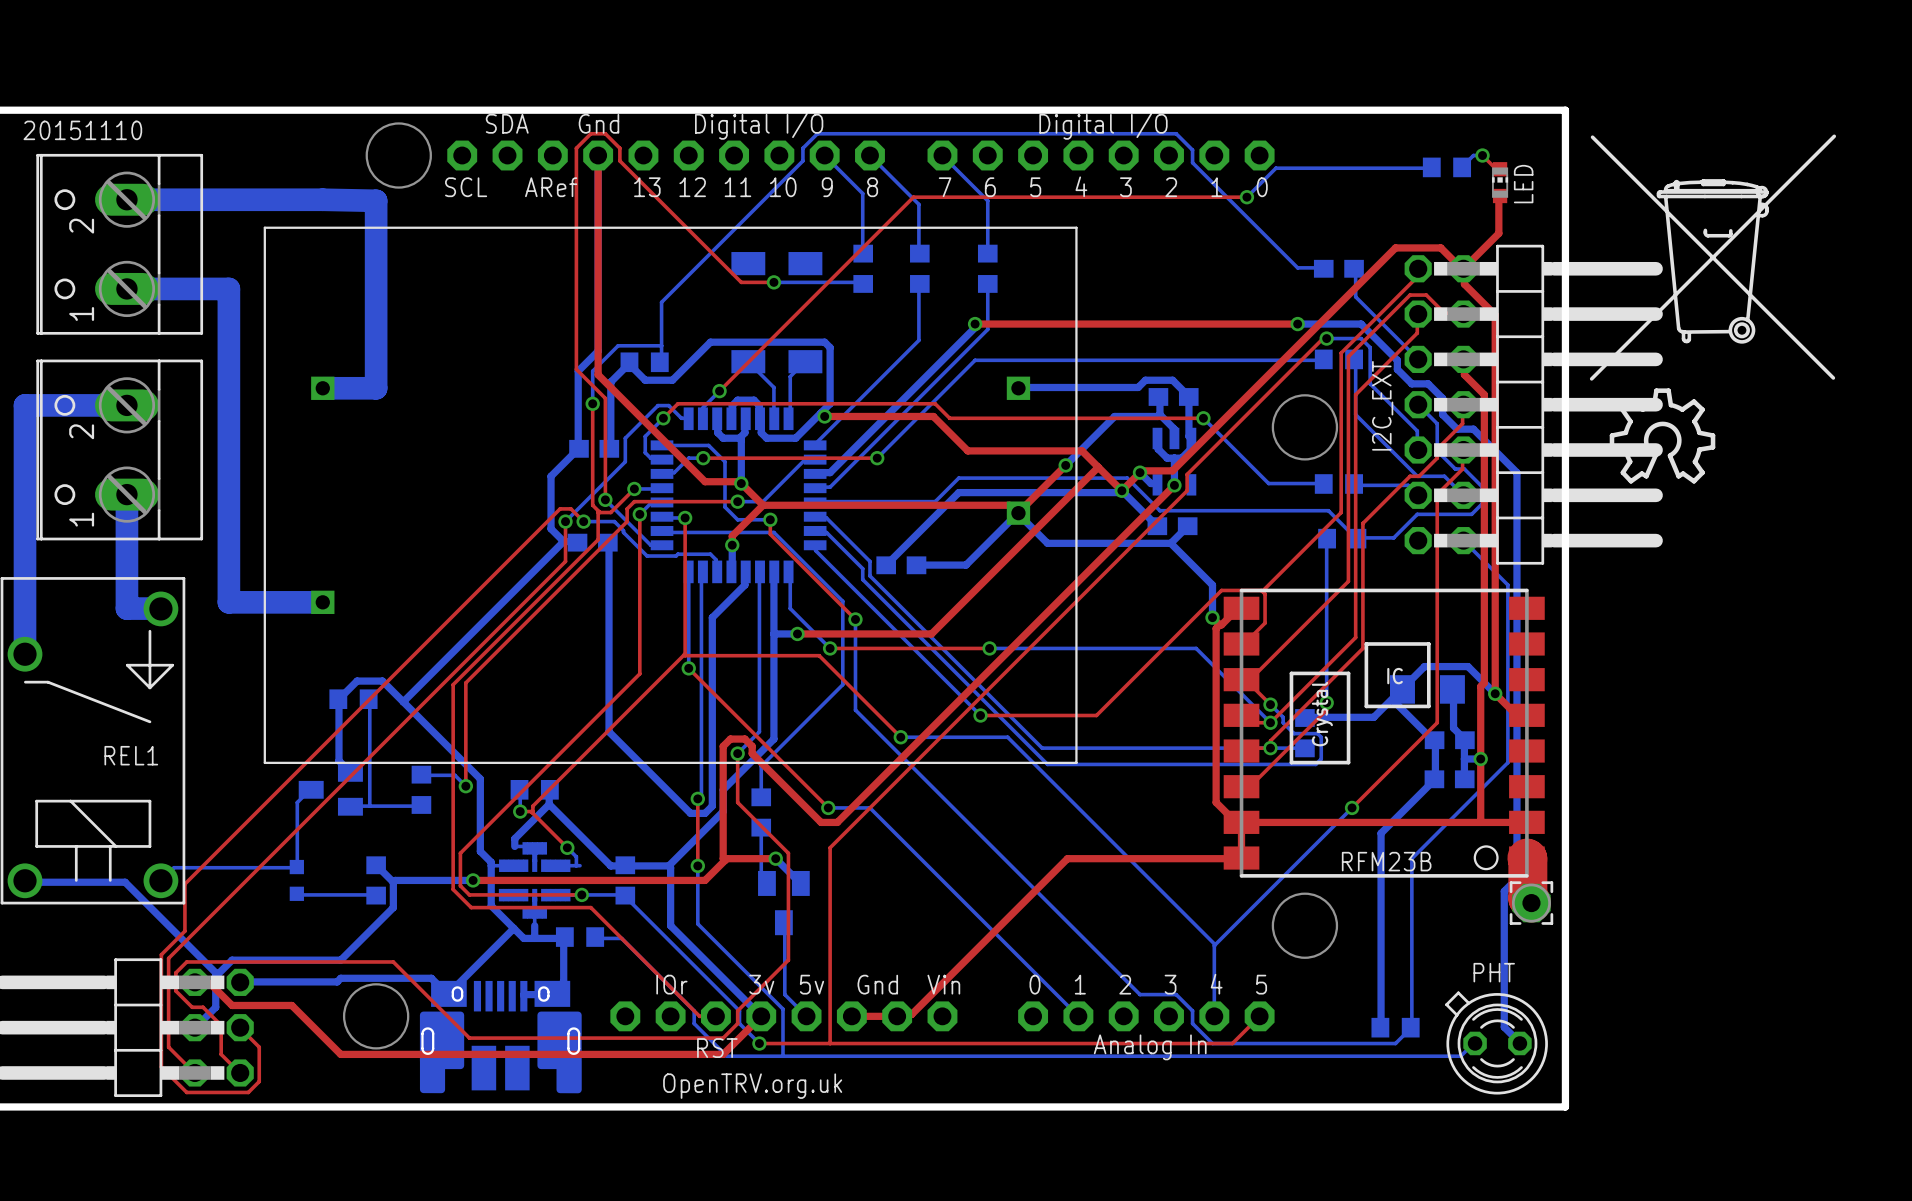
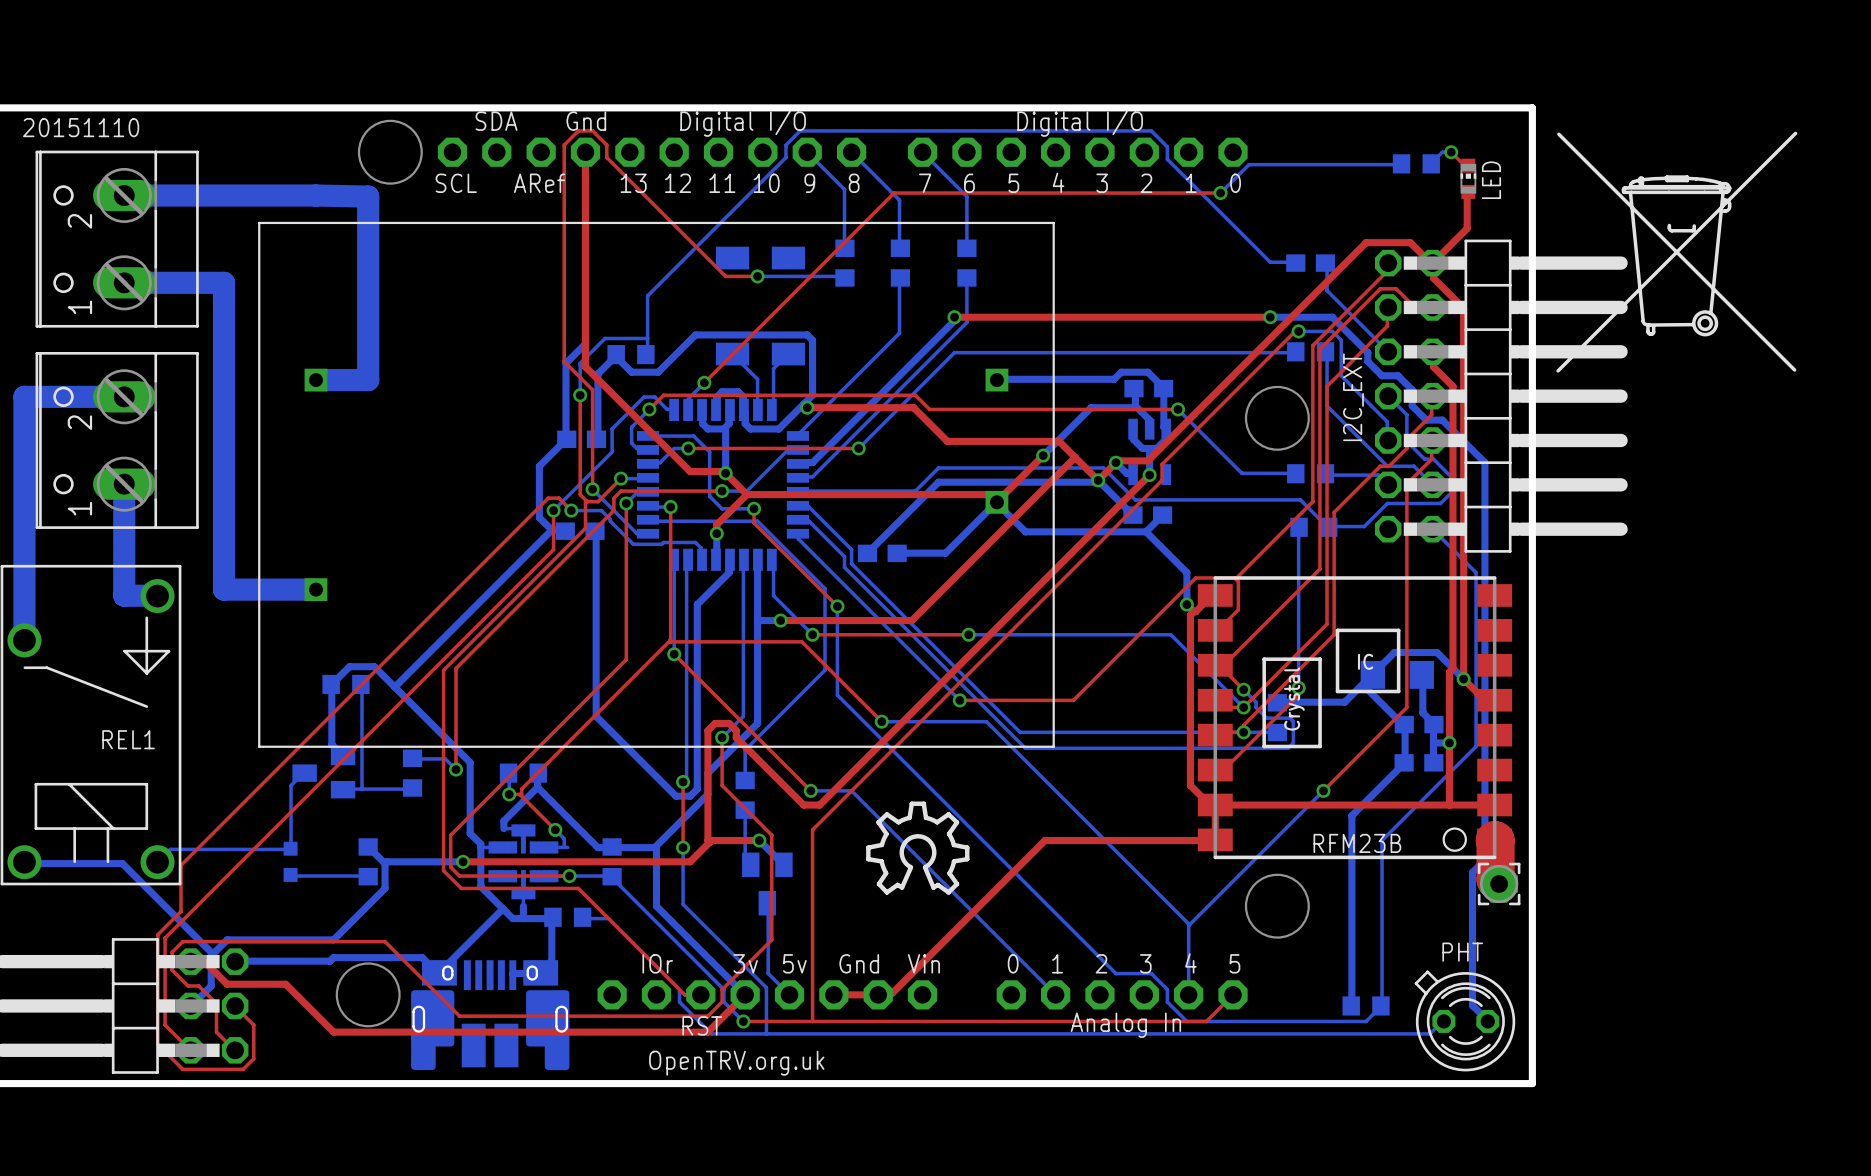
drawing: [1609, 388, 1716, 484] -> none
drawing: none -> [866, 801, 970, 895]

